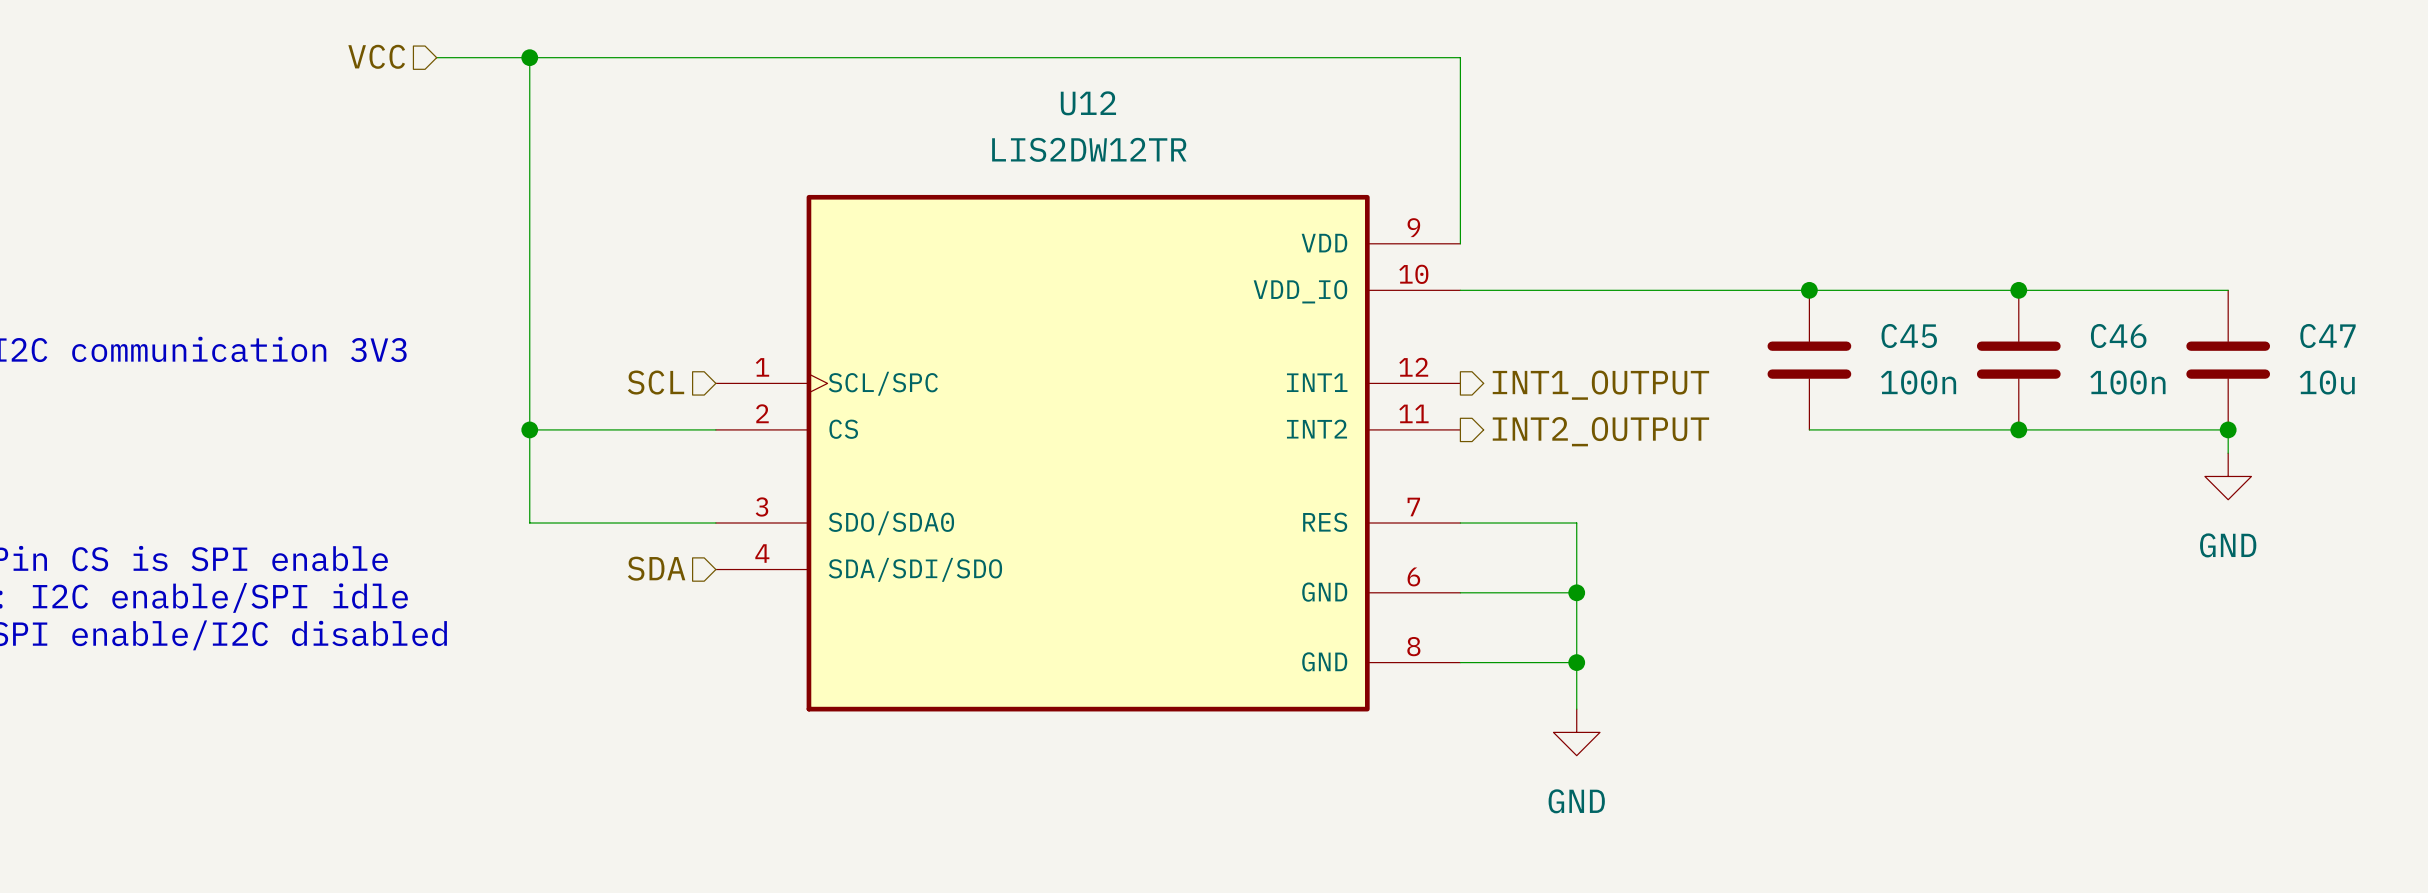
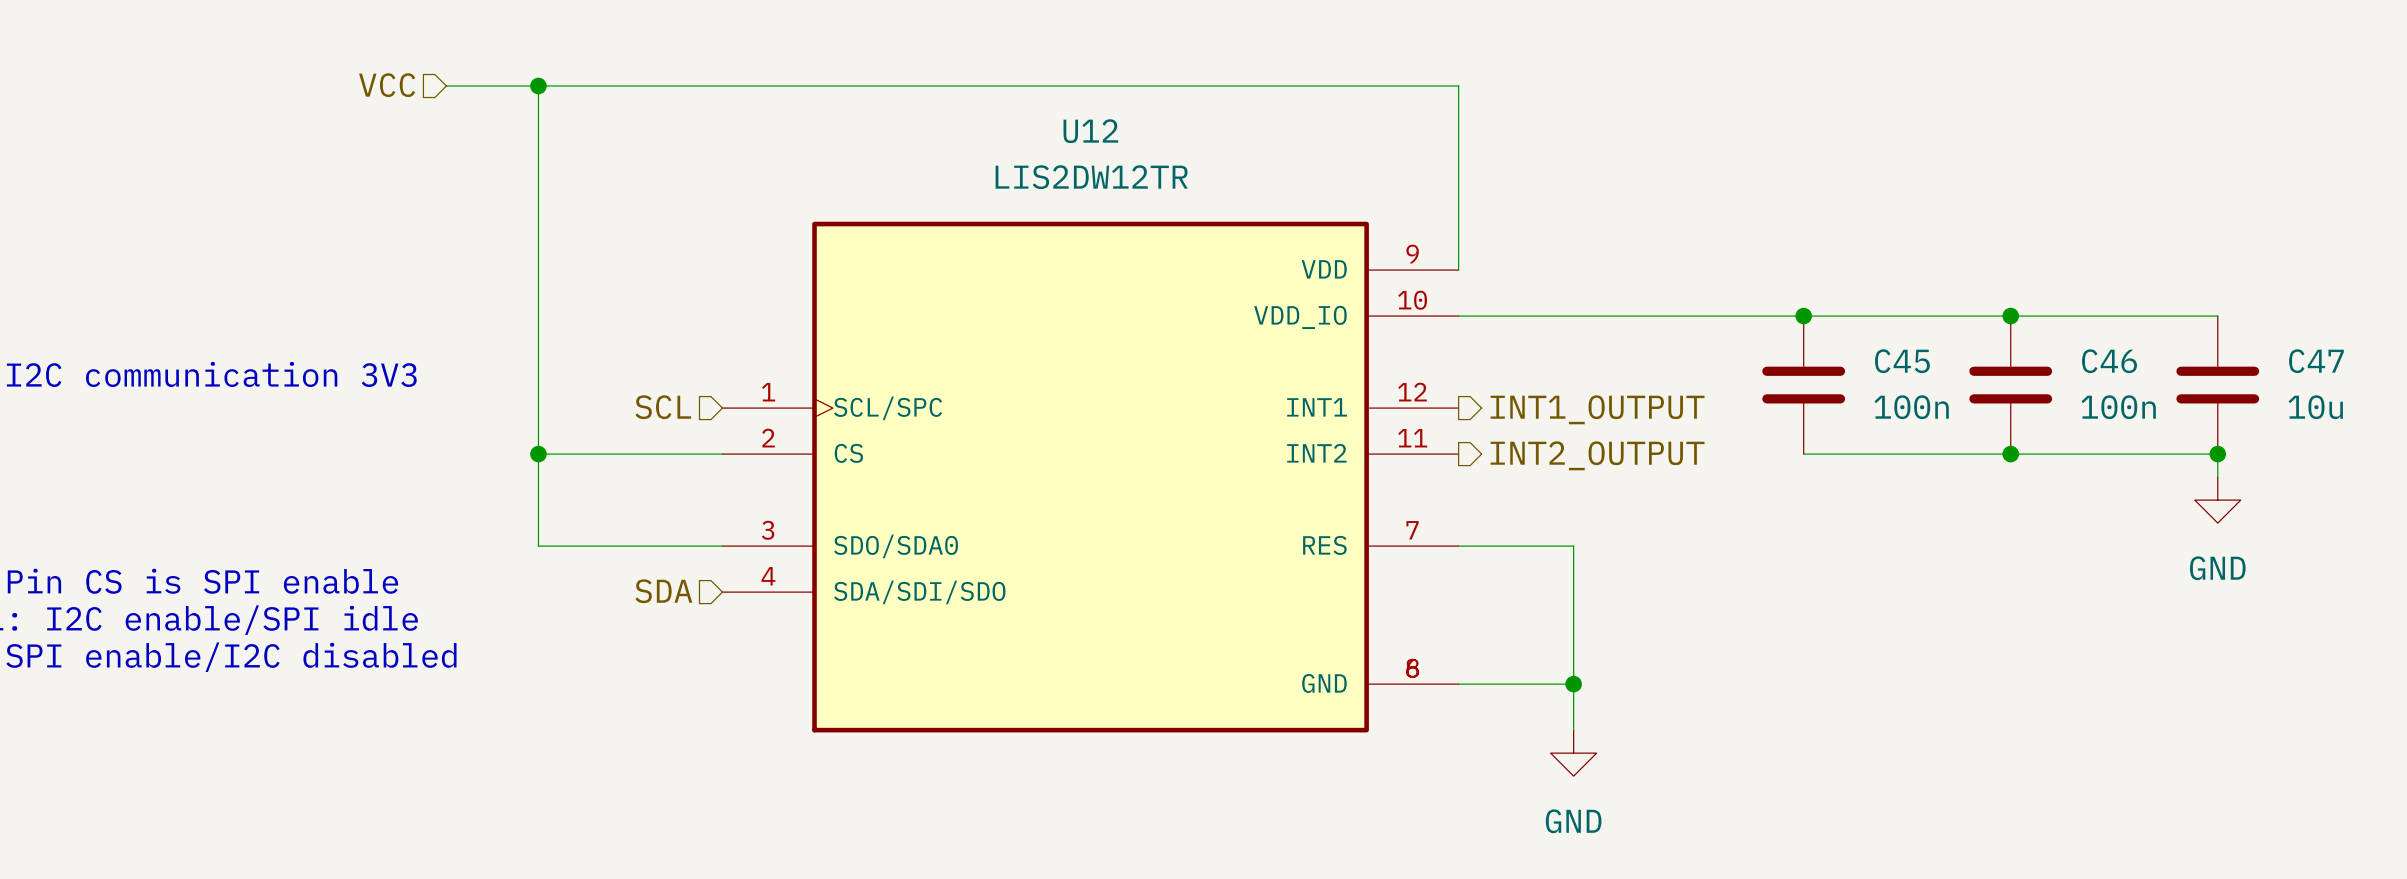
U12 symbol: [715, 194, 1461, 712] -> [722, 221, 1459, 733]
wire: (1460, 592) (1576, 592) -> none
junction: (1576, 592) -> none

